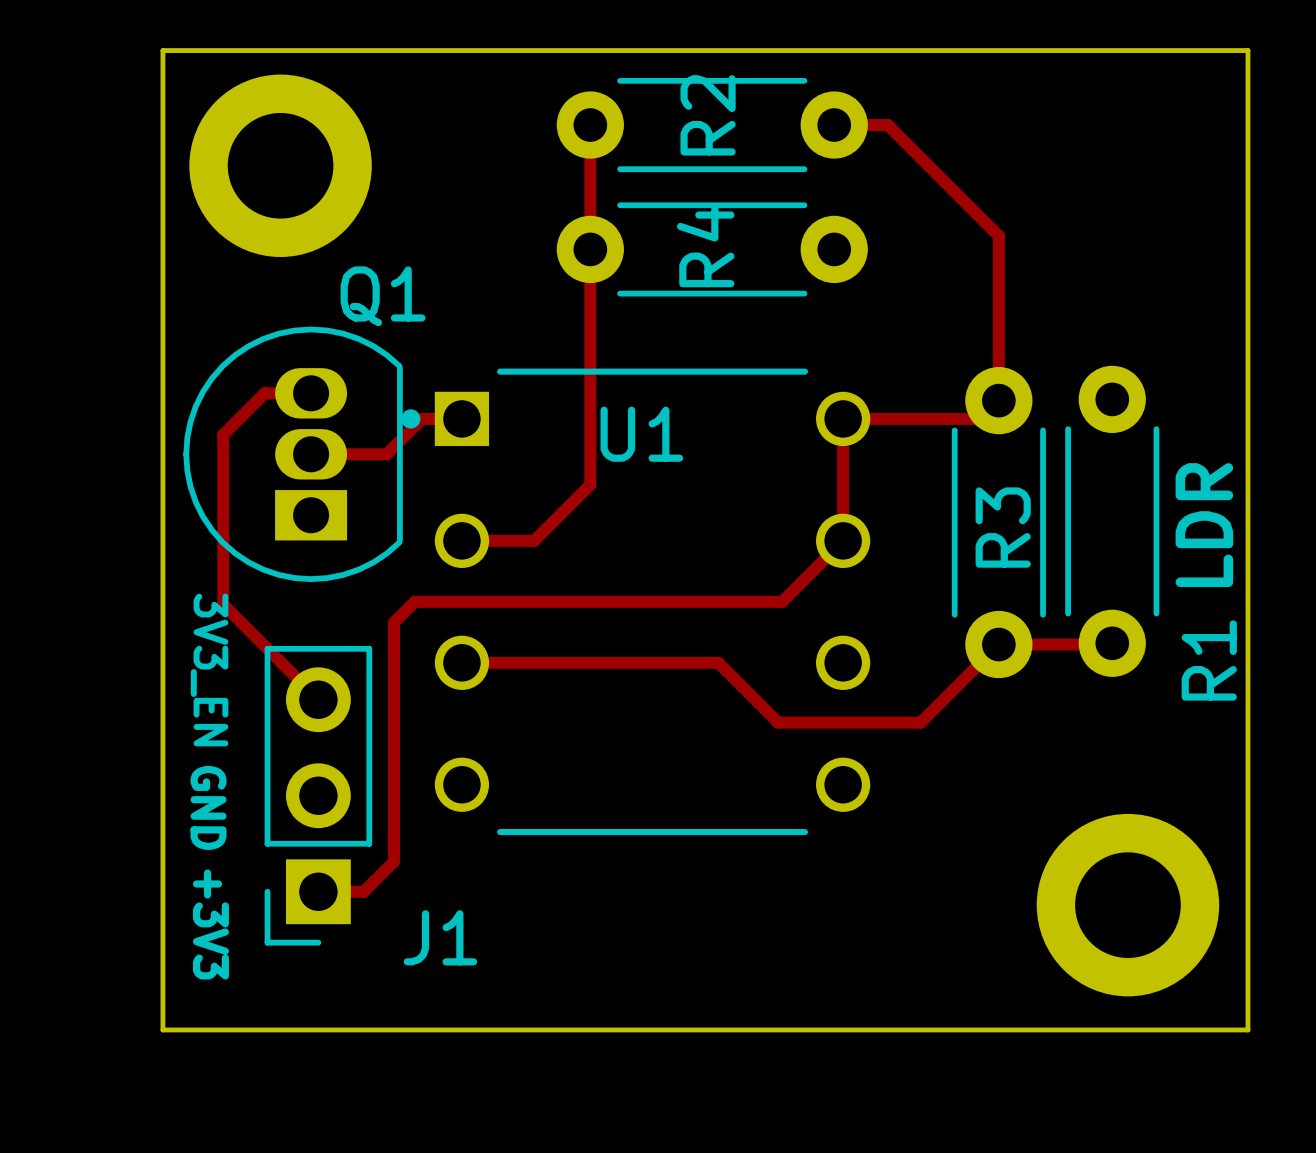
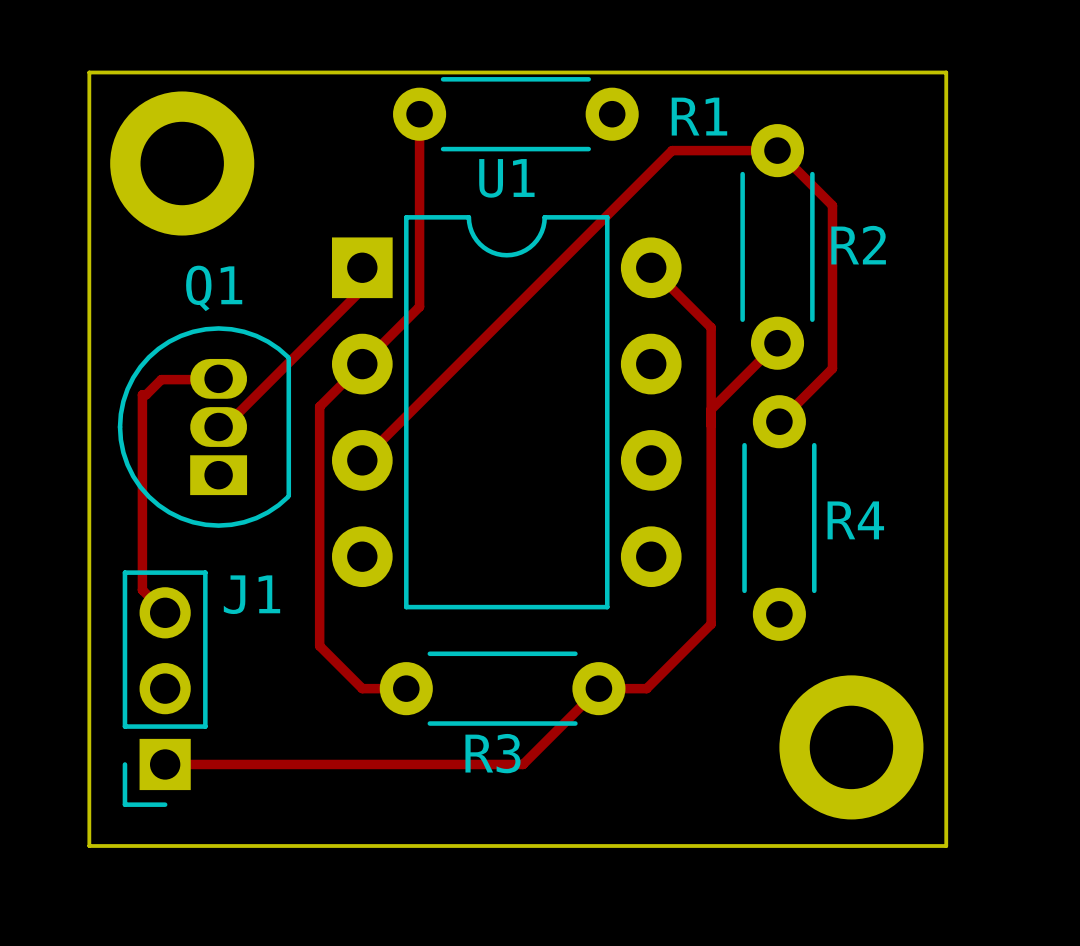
track: none -> (419, 114) (419, 306) (319, 406) (319, 645) (362, 688) (406, 688)
track: (590, 125) (590, 484) (534, 540) (461, 540) -> none
R2 rotation: 0° (712, 125) -> 90° clockwise (777, 246)
R2 position: (712, 125) -> (777, 246)
track: (834, 125) (887, 125) (998, 236) (998, 400) (980, 418) (843, 418) (843, 540) (782, 601) (414, 601) (394, 622) (394, 861) (363, 891) (318, 891) -> none
R4 rotation: 0° (712, 249) -> 90° clockwise (779, 518)
R4 position: (712, 249) -> (779, 518)
Q1 name position: Q1 (383, 296) -> Q1 (214, 288)
track: none -> (362, 267) (362, 289) (224, 427)
track: none -> (651, 267) (711, 327) (711, 624) (646, 688) (598, 688) (523, 764) (165, 764)
U1 footprint: [401, 368, 871, 836] -> [331, 215, 682, 610]
track: (311, 393) (264, 393) (223, 434) (223, 604) (318, 699) -> none
track: none -> (777, 343) (711, 409)
track: (461, 418) (422, 418) (386, 454) (311, 454) -> none
U1 name position: U1 (641, 434) -> U1 (506, 178)
track: none -> (209, 379) (161, 379) (146, 394) (142, 394) (142, 590) (165, 612)
Q1 position: (293, 454) -> (204, 427)
track: none -> (779, 421) (832, 368) (832, 205) (777, 150) (672, 150) (362, 460)
R1 rotation: 0° (1112, 521) -> 90° clockwise (515, 114)
R1 position: (1112, 521) -> (515, 114)
R3 rotation: 0° (998, 522) -> 90° clockwise (502, 688)
R3 position: (998, 522) -> (502, 688)
text: LDR (1204, 525) -> none
track: (1112, 643) (998, 644) (920, 722) (778, 722) (718, 662) (461, 662) -> none
R1 name position: R1 (1209, 660) -> R1 (699, 116)
text: 3V3_EN (209, 669) -> none
J1 position: (318, 795) -> (165, 688)
text: GND (208, 807) -> none
text: +3V3 (210, 924) -> none
J1 name position: J1 (440, 937) -> J1 (251, 594)

